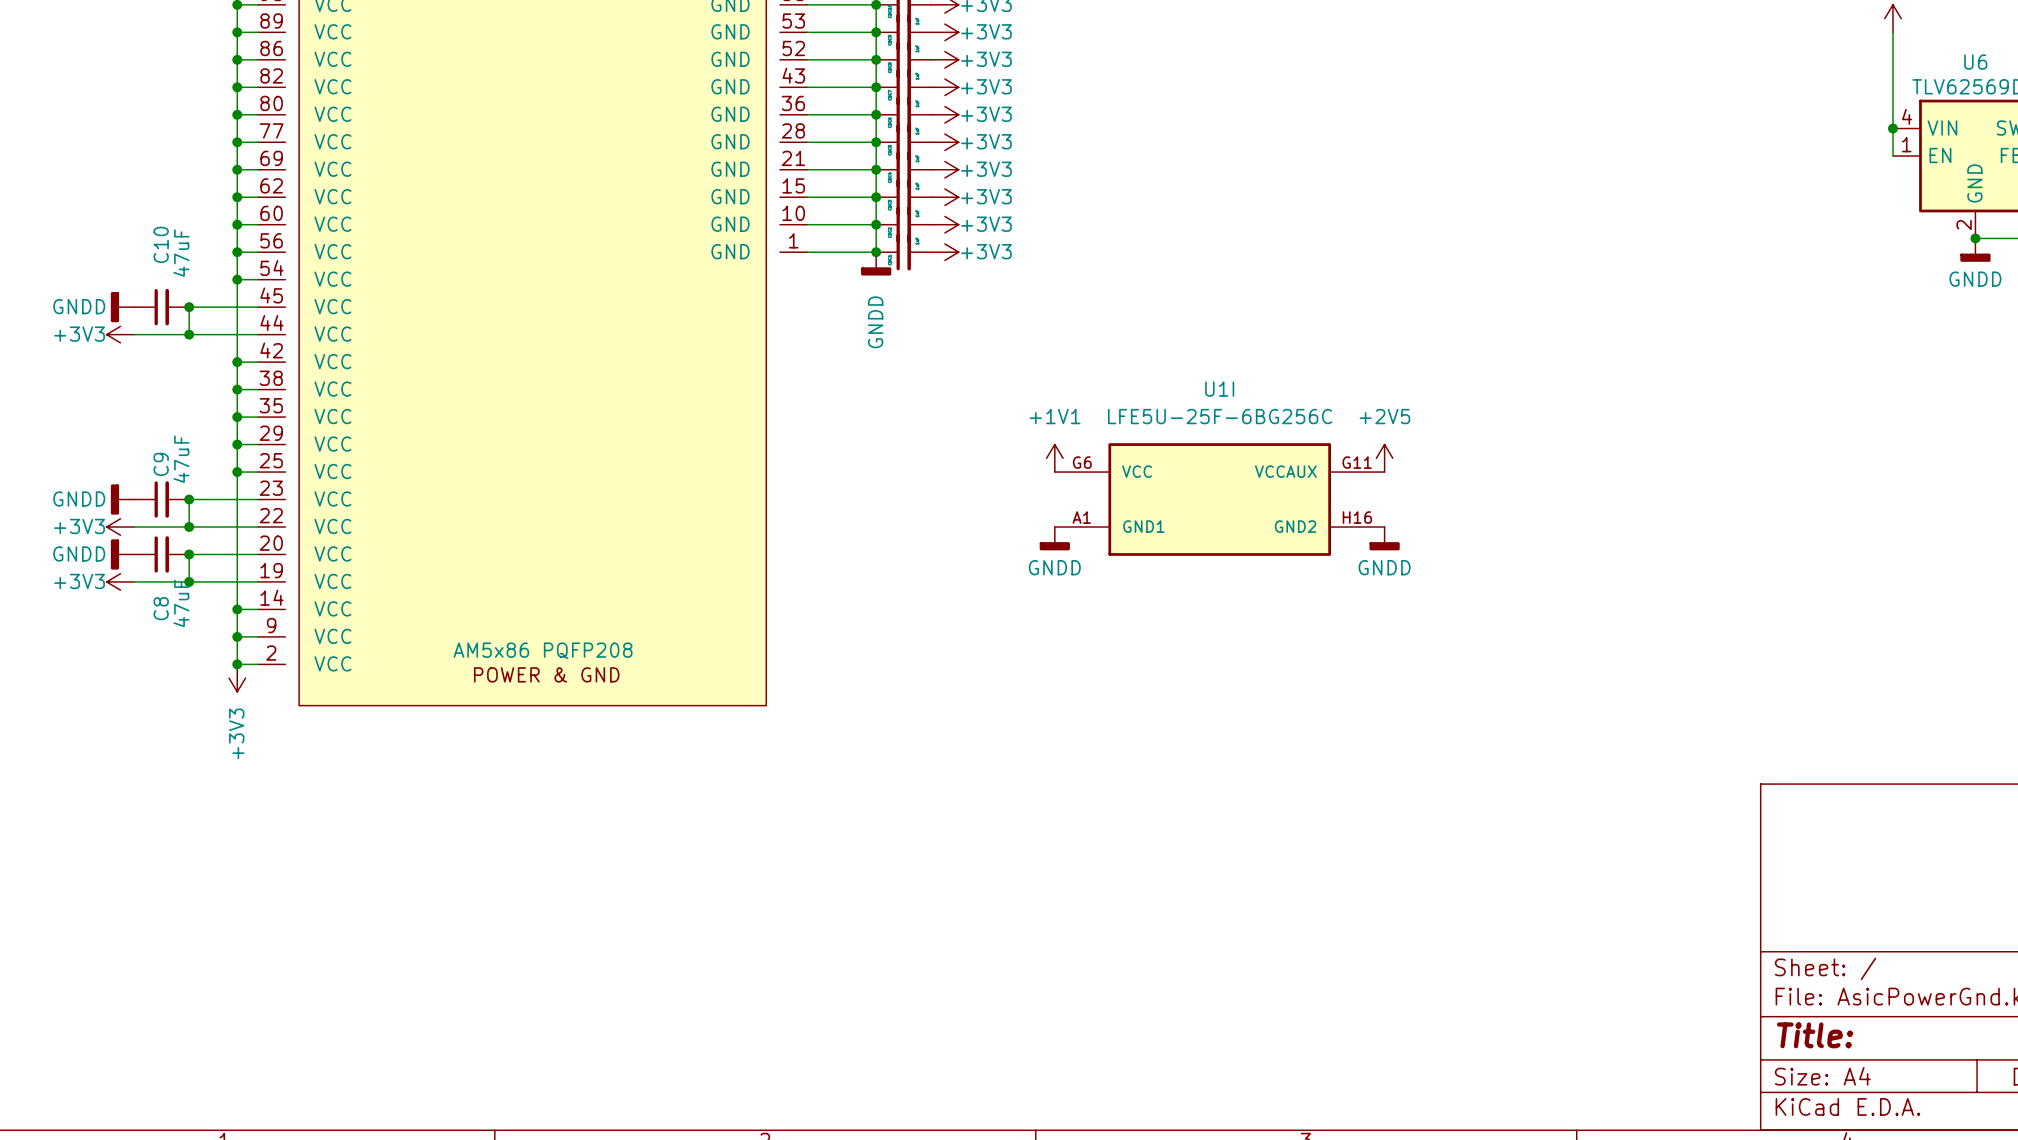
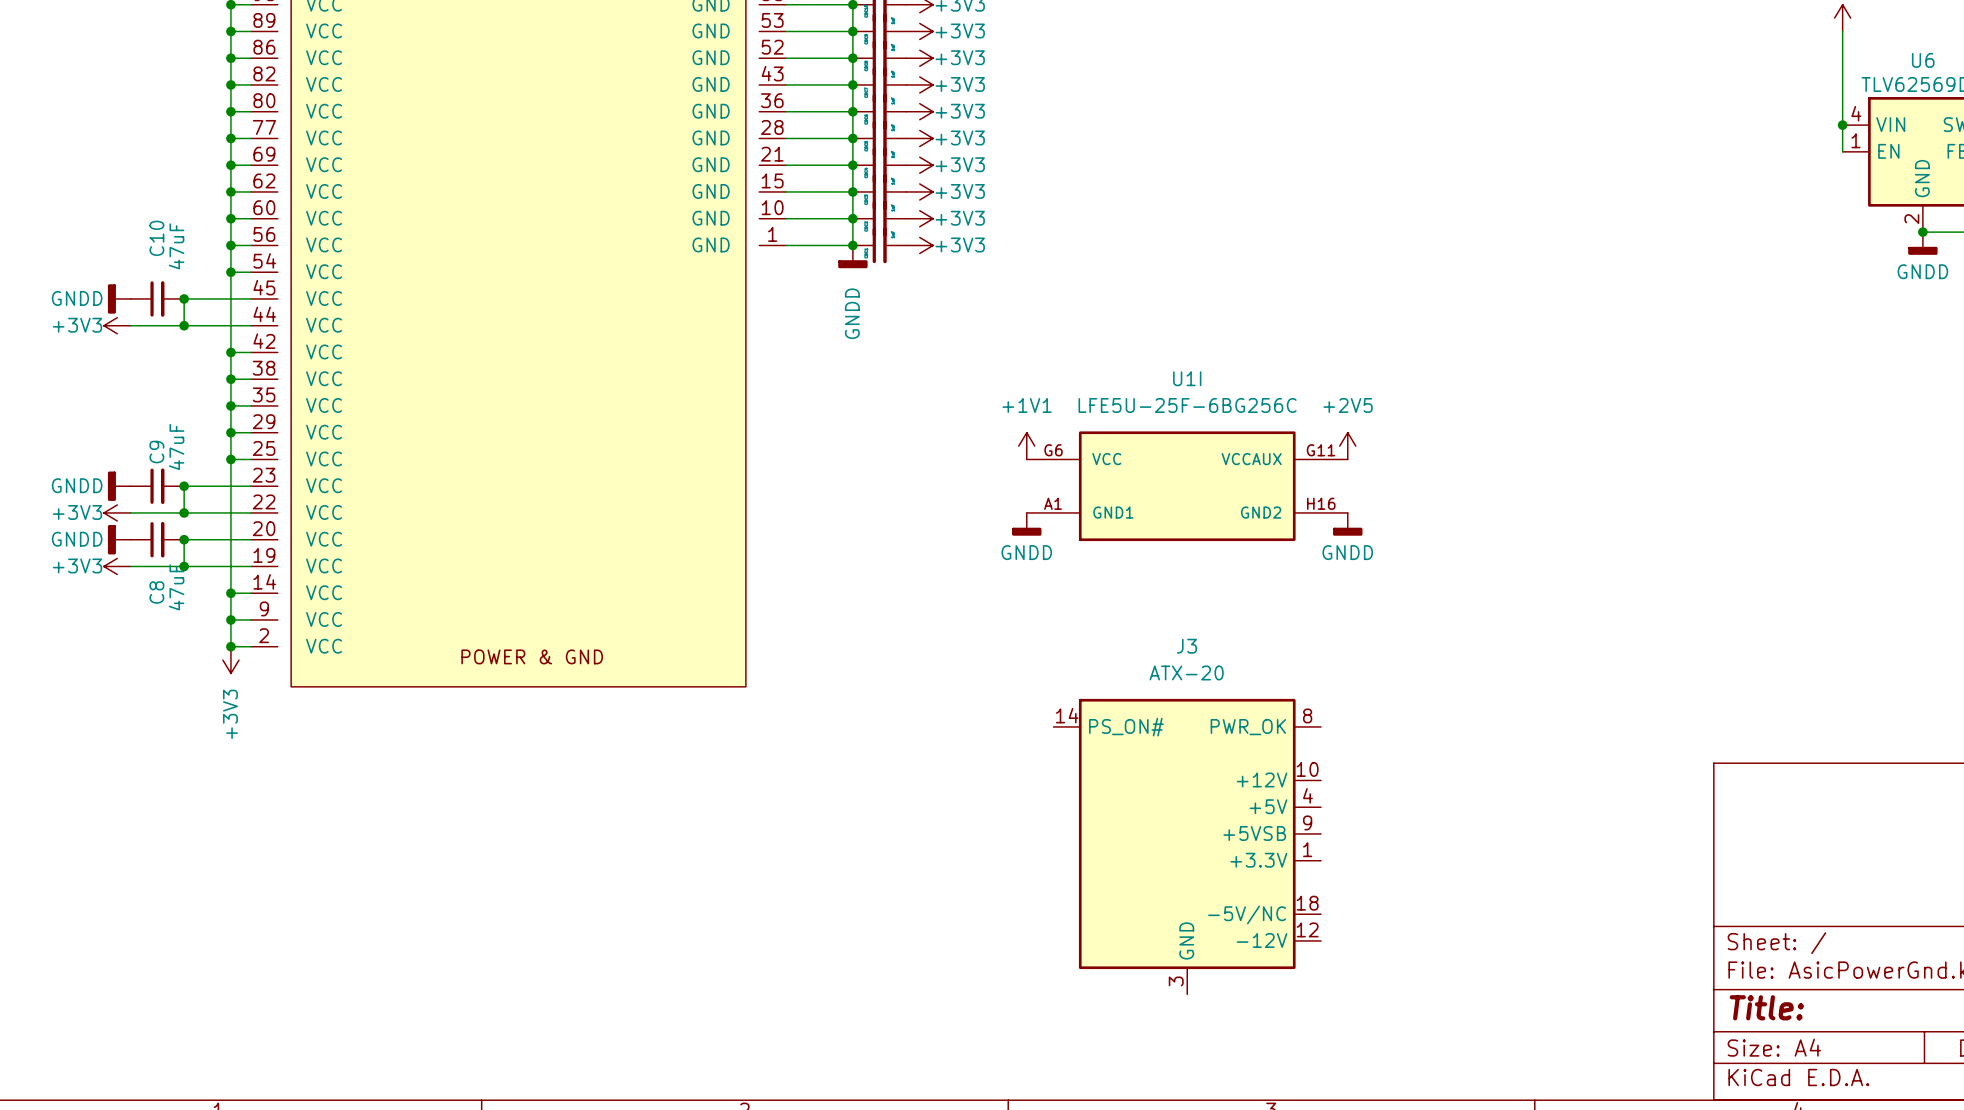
part value: AM5x86 PQFP208 (543, 650) -> none
J3: none -> ATX-20 (1187, 846)

